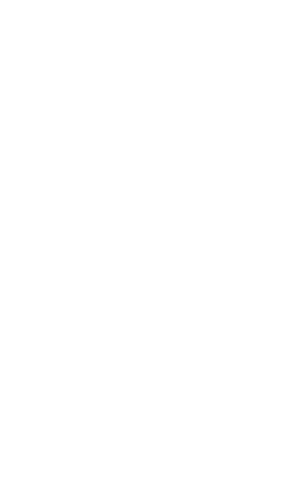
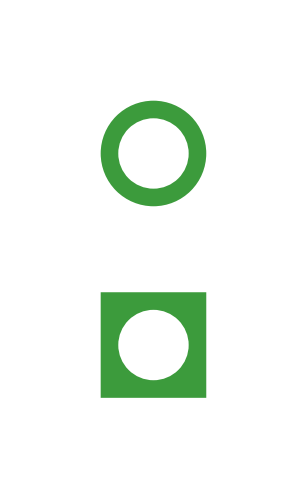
part: none -> (153, 249)

